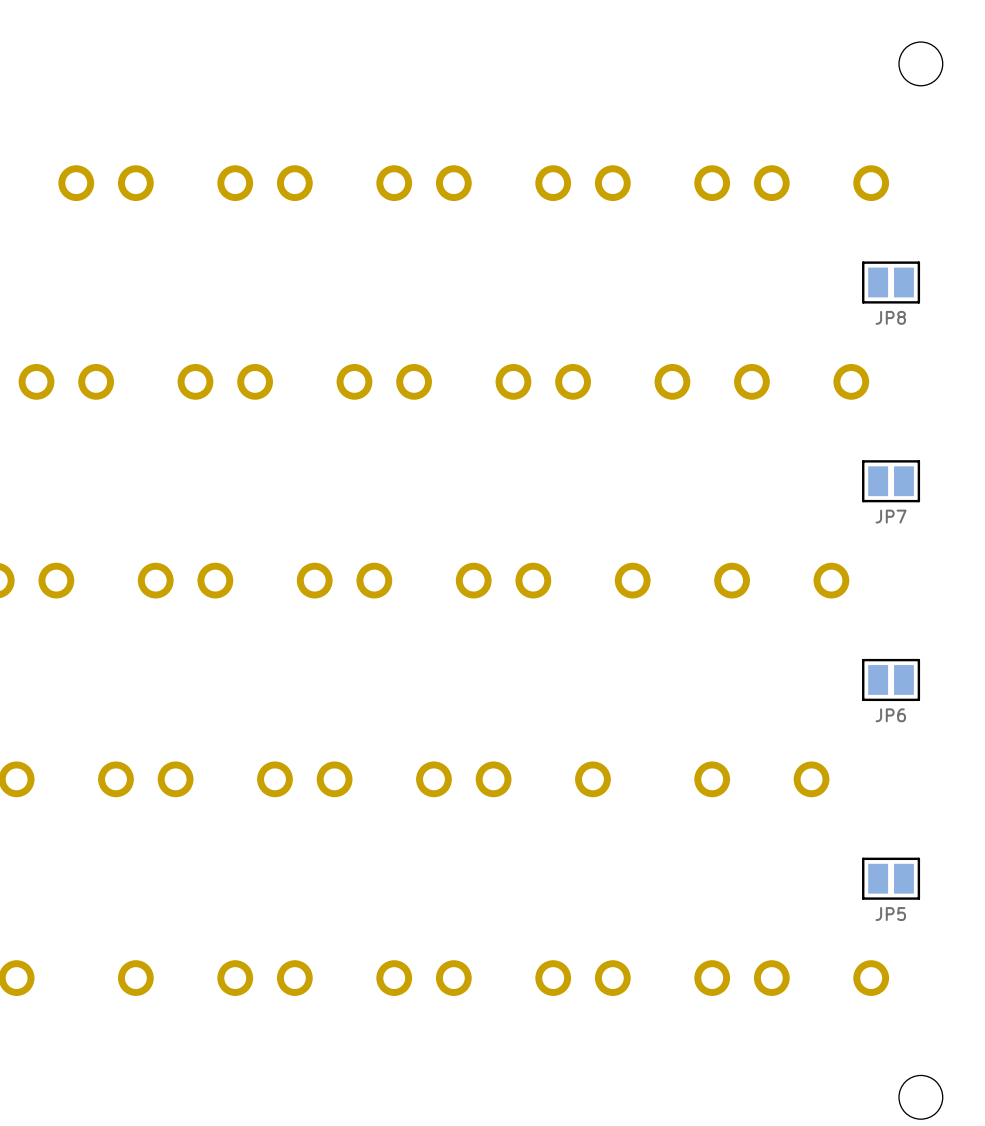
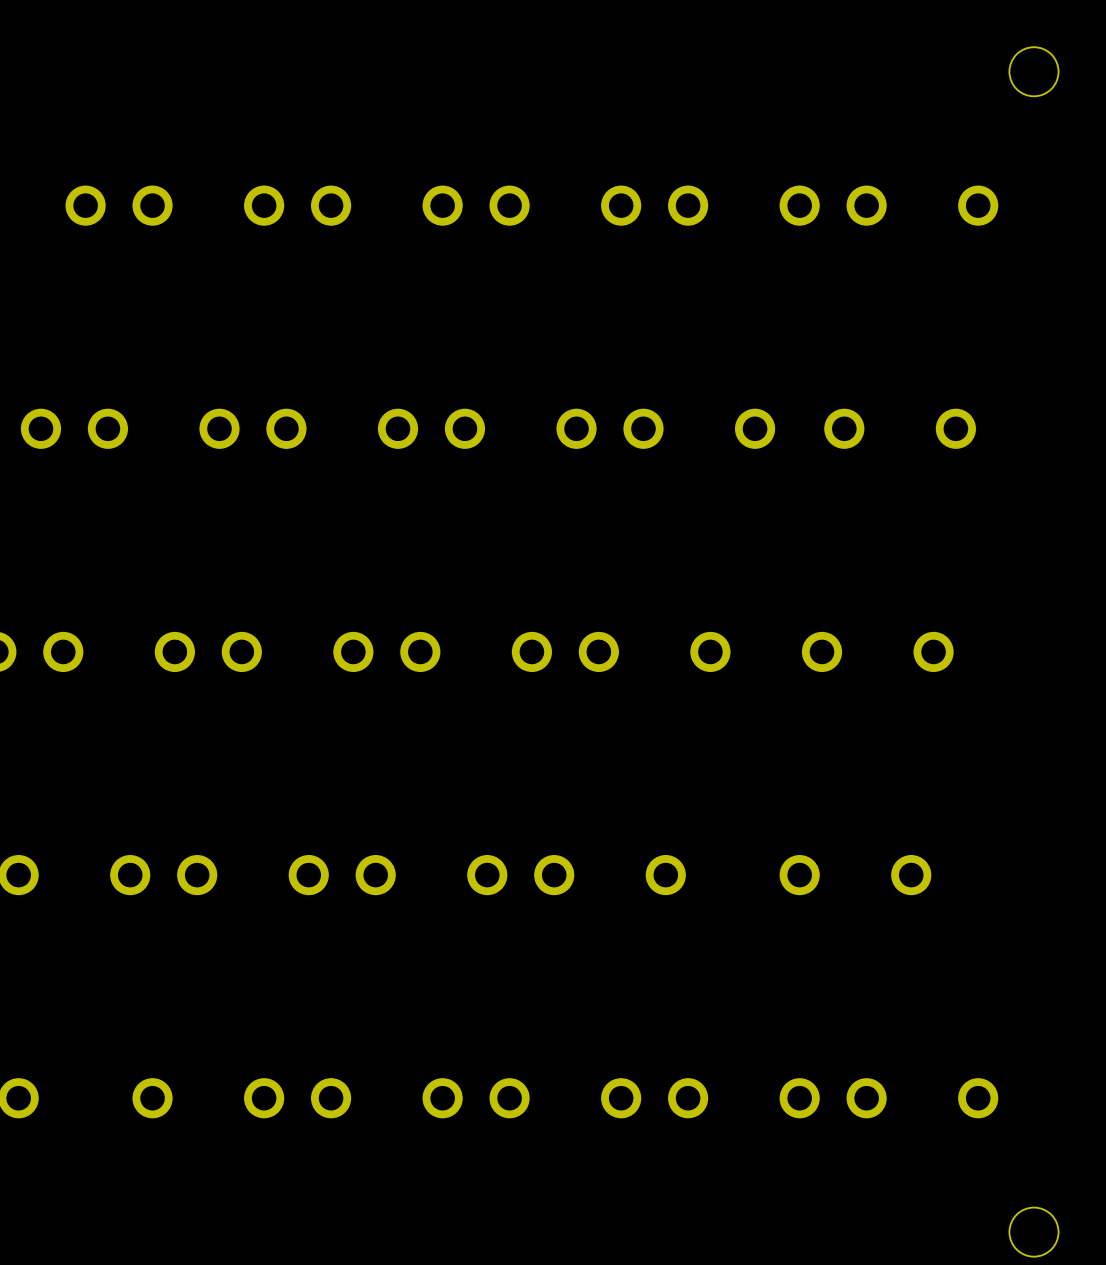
JP8: (891, 282) -> none
JP7: (891, 481) -> none
JP6: (891, 679) -> none
JP5: (891, 878) -> none

